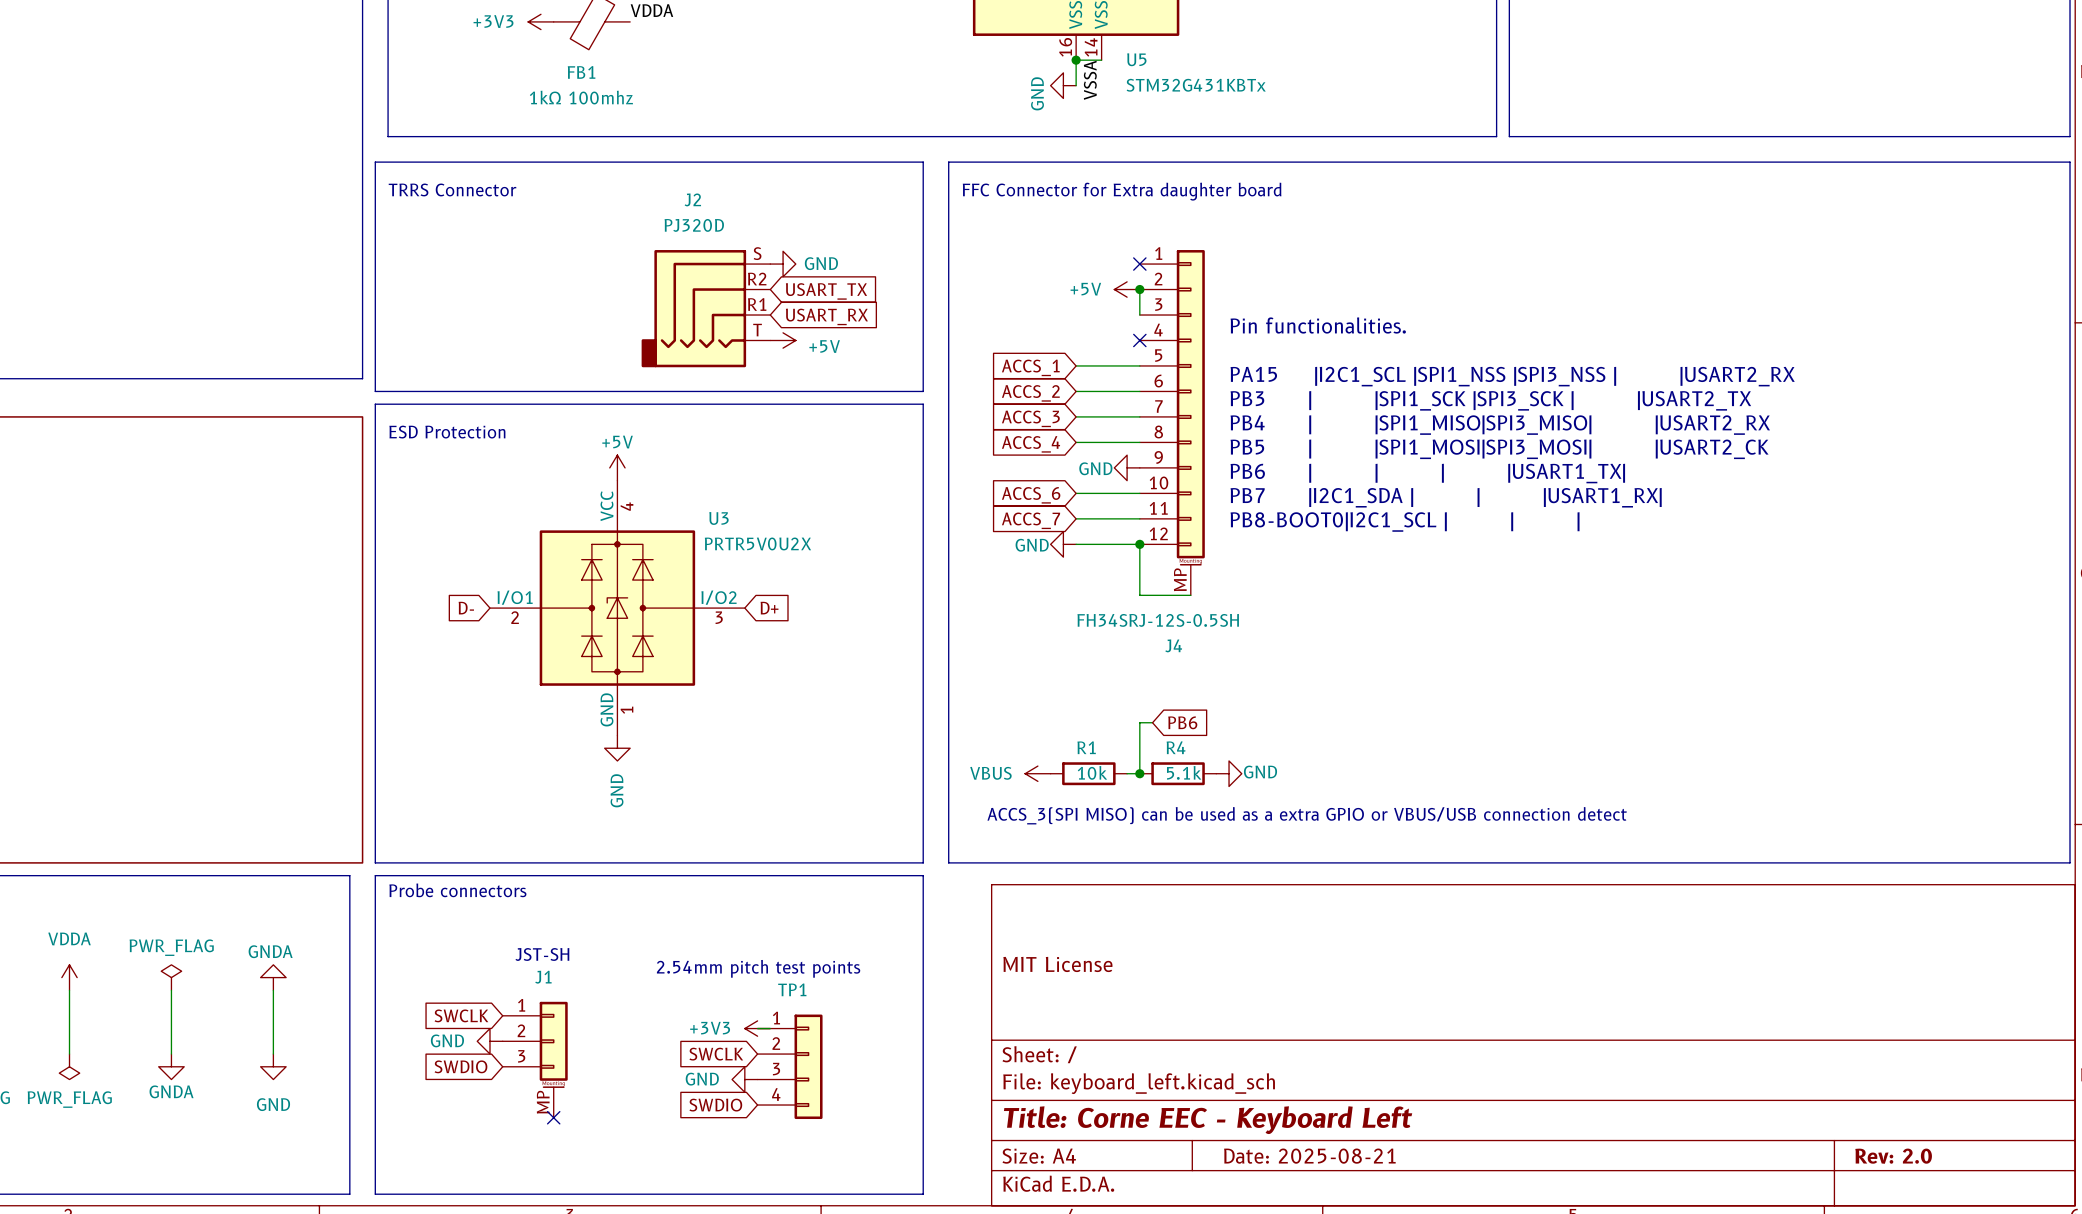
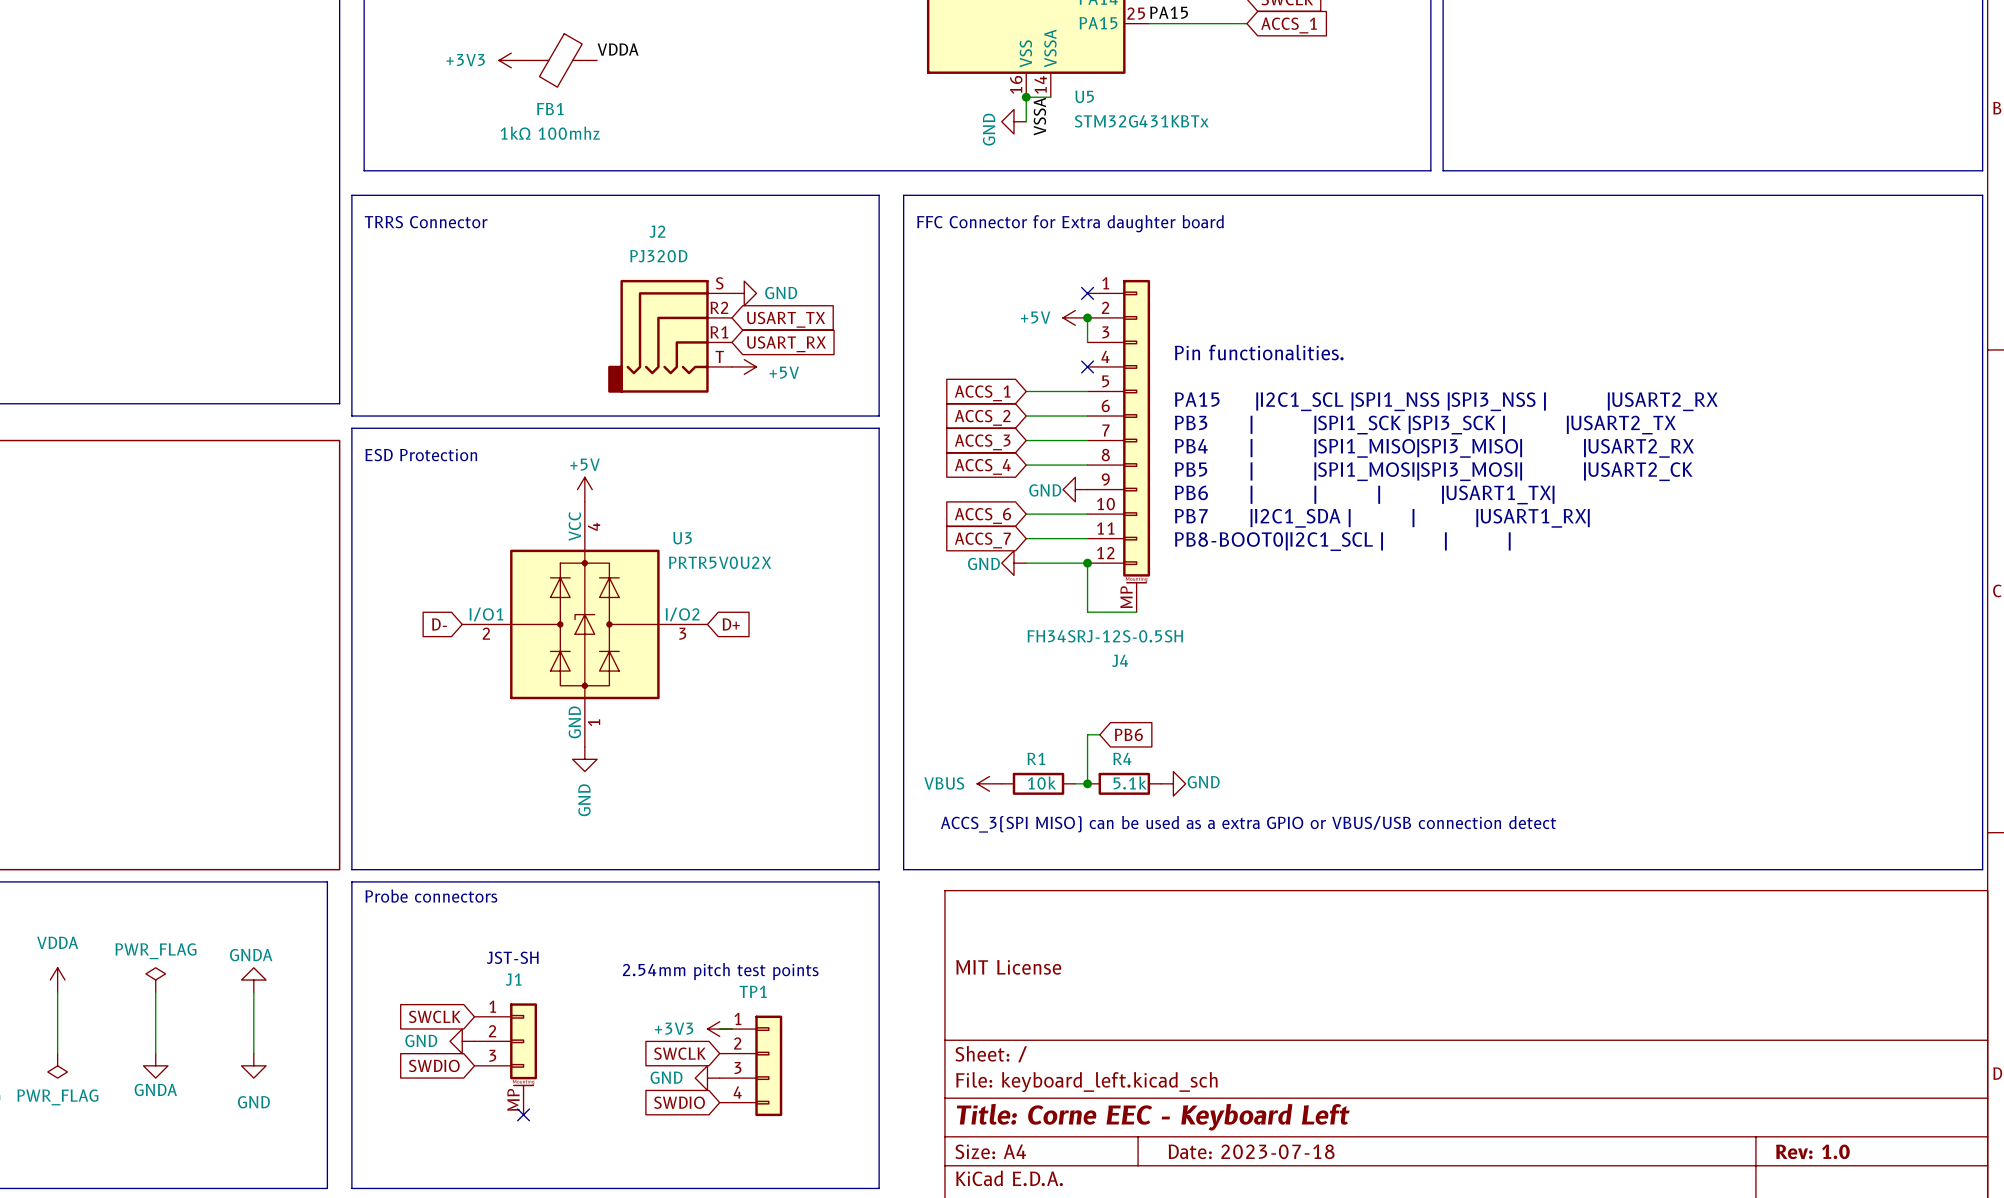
title block: Date: 2025-08-21 (1309, 1156) -> Date: 2023-07-18 (1251, 1151)
title block: Rev: 2.0 (1893, 1156) -> Rev: 1.0 (1812, 1151)

